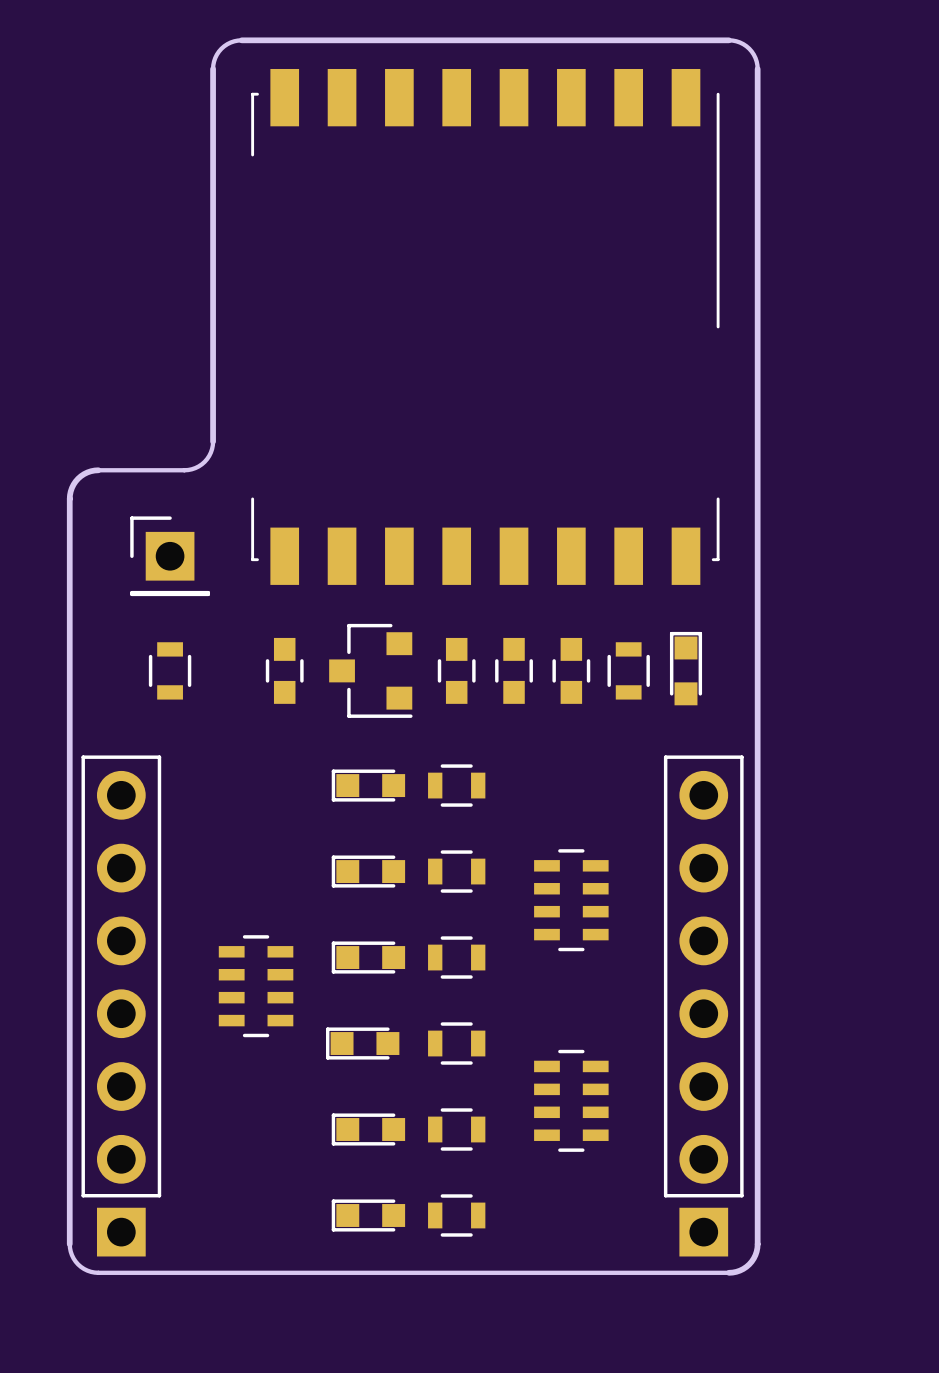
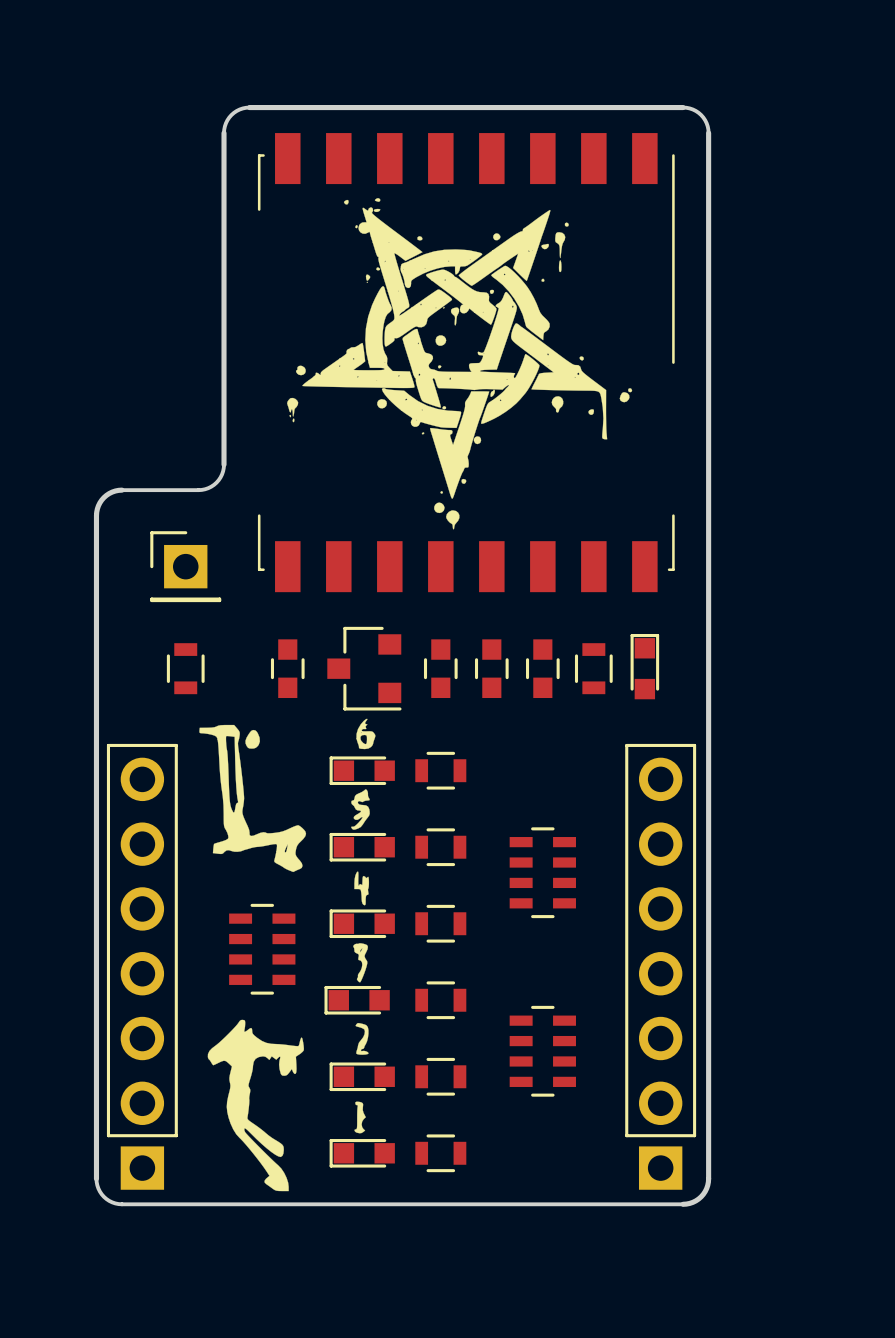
drawing: none -> [199, 198, 633, 1192]

